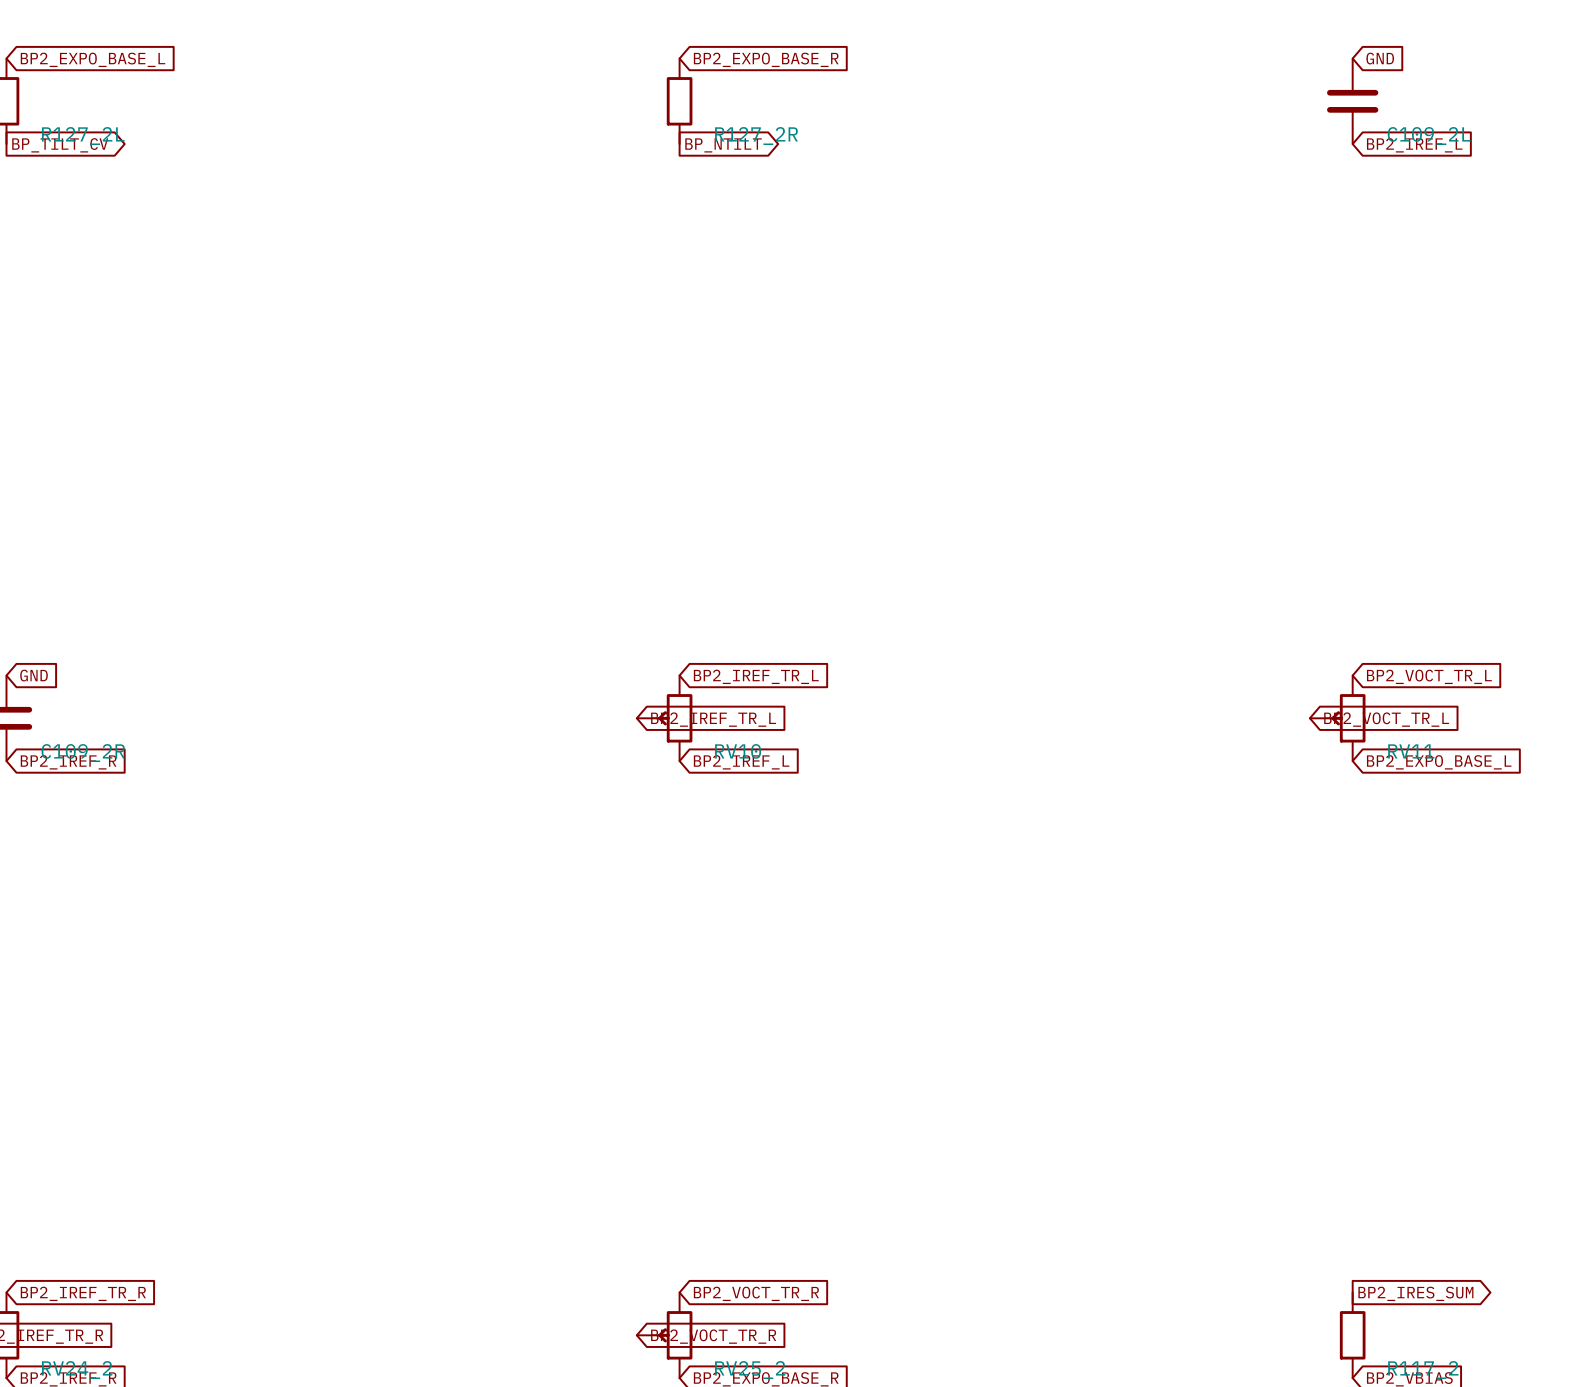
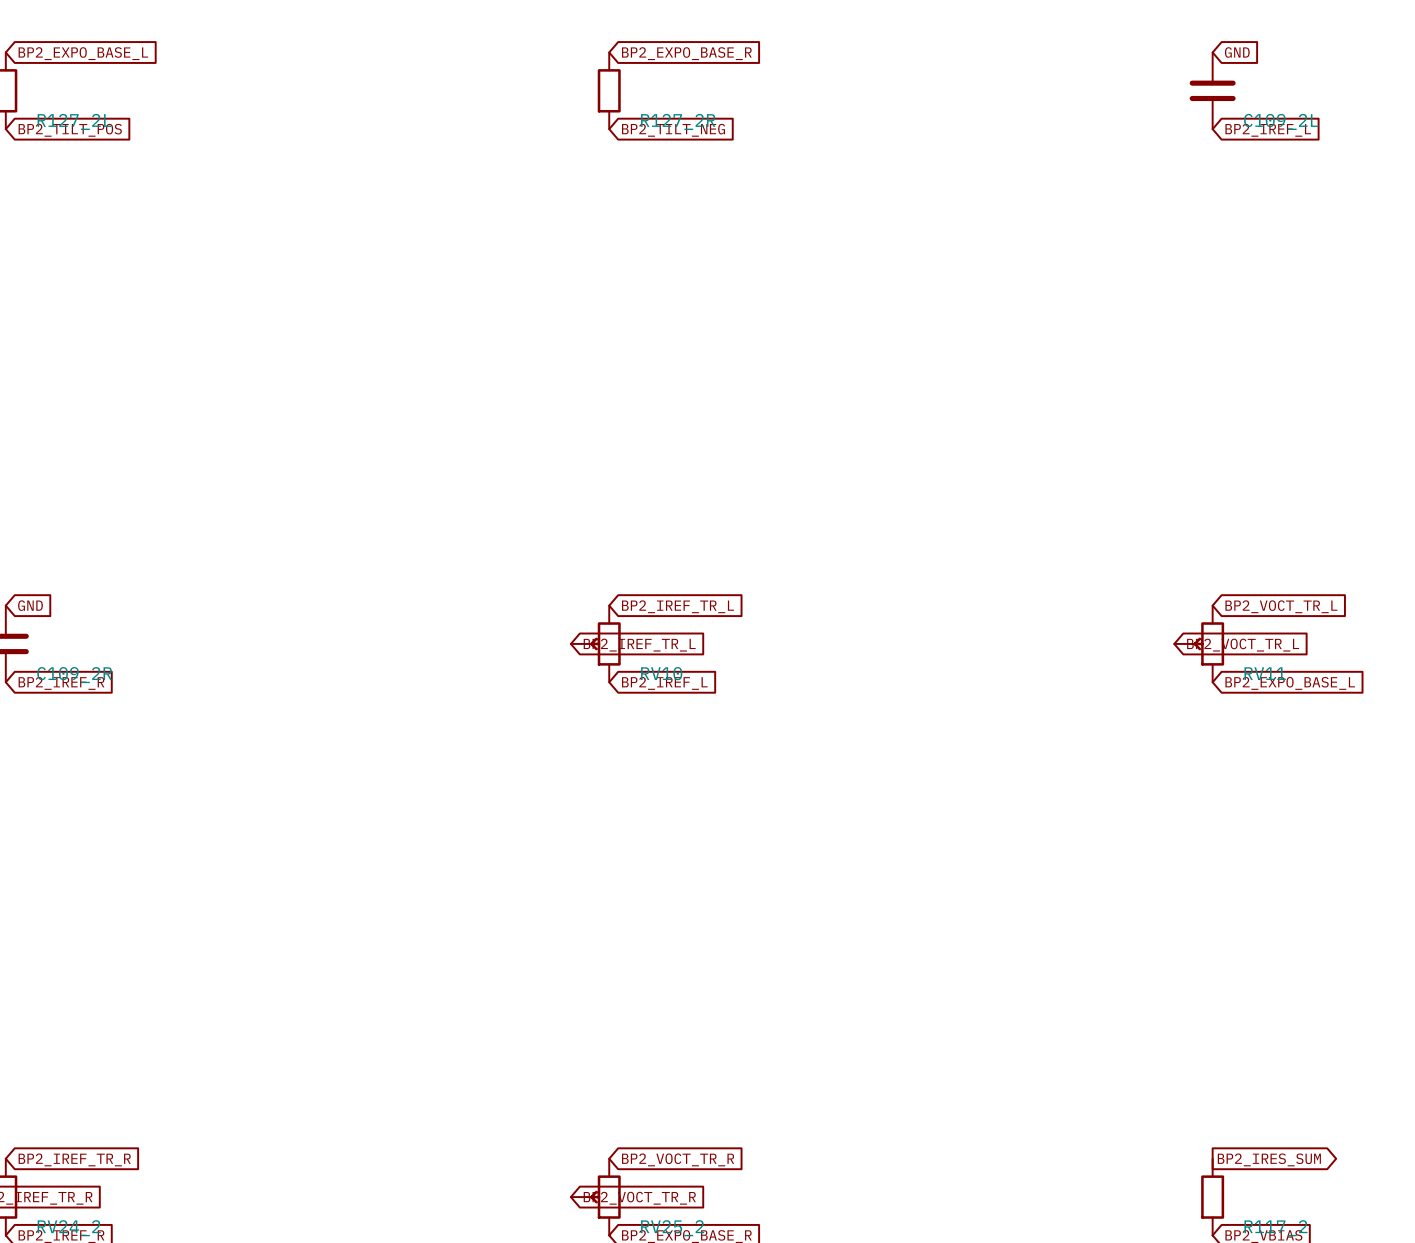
global label shape: output (60, 145) -> input (70, 130)
global label: BP_TILT_CV (60, 145) -> BP2_TILT_POS (70, 130)
global label shape: output (723, 145) -> input (673, 130)
global label: BP_NTILT (723, 145) -> BP2_TILT_NEG (673, 130)

